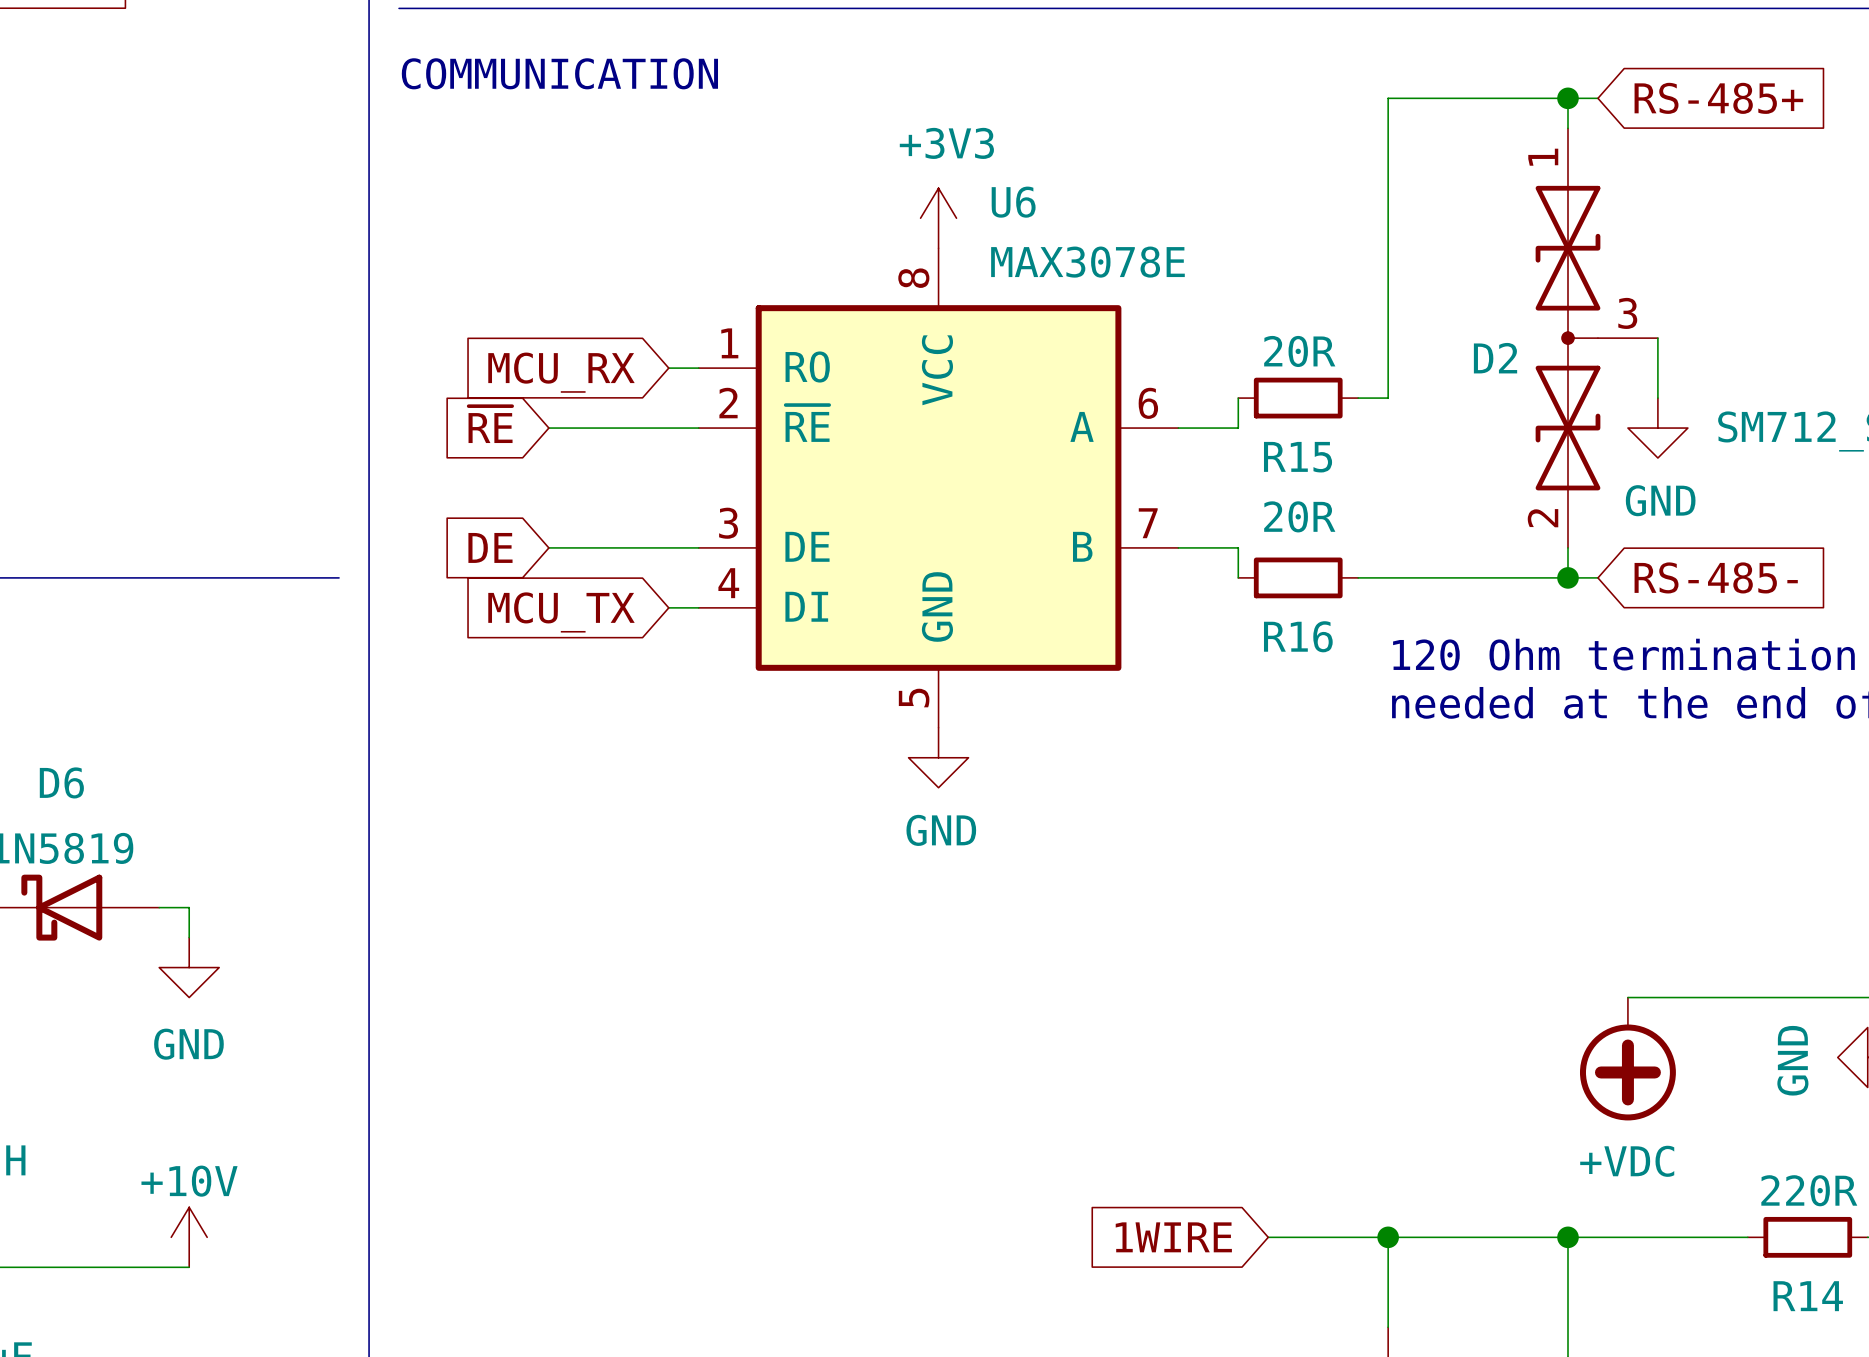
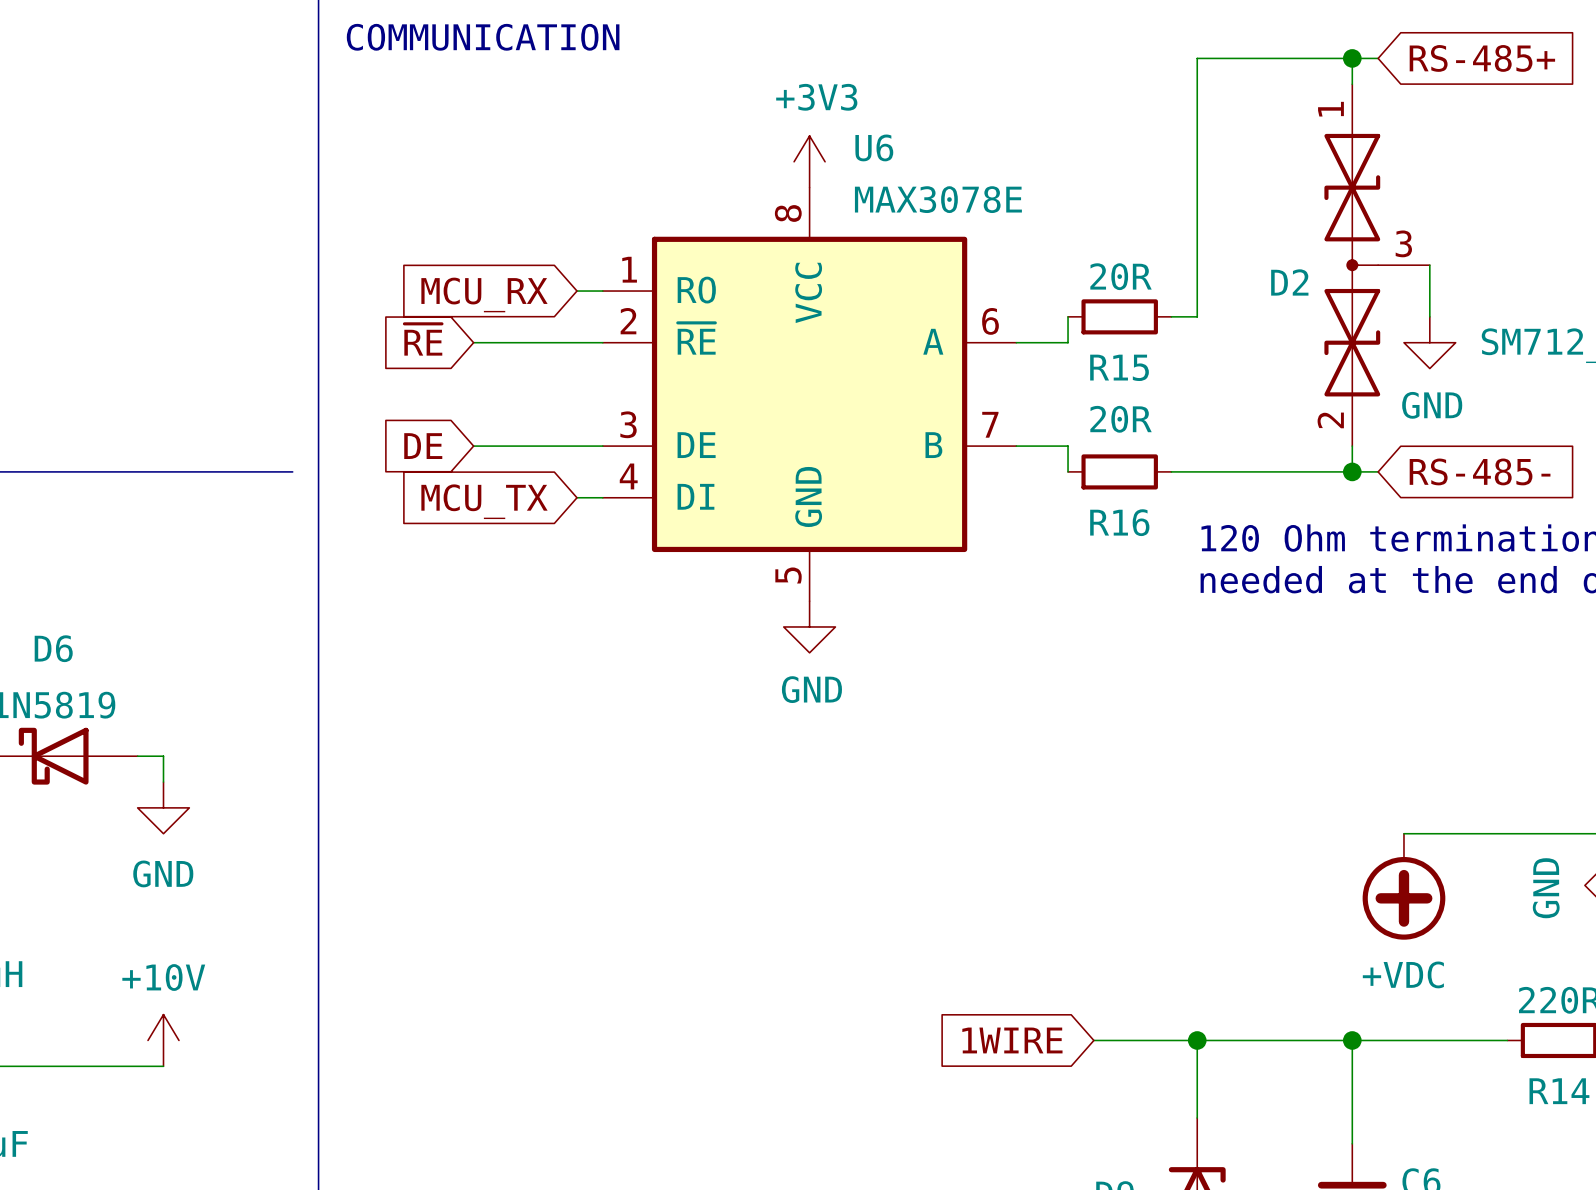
power symbol text position: +10V (189, 1181) -> +10V (163, 977)

